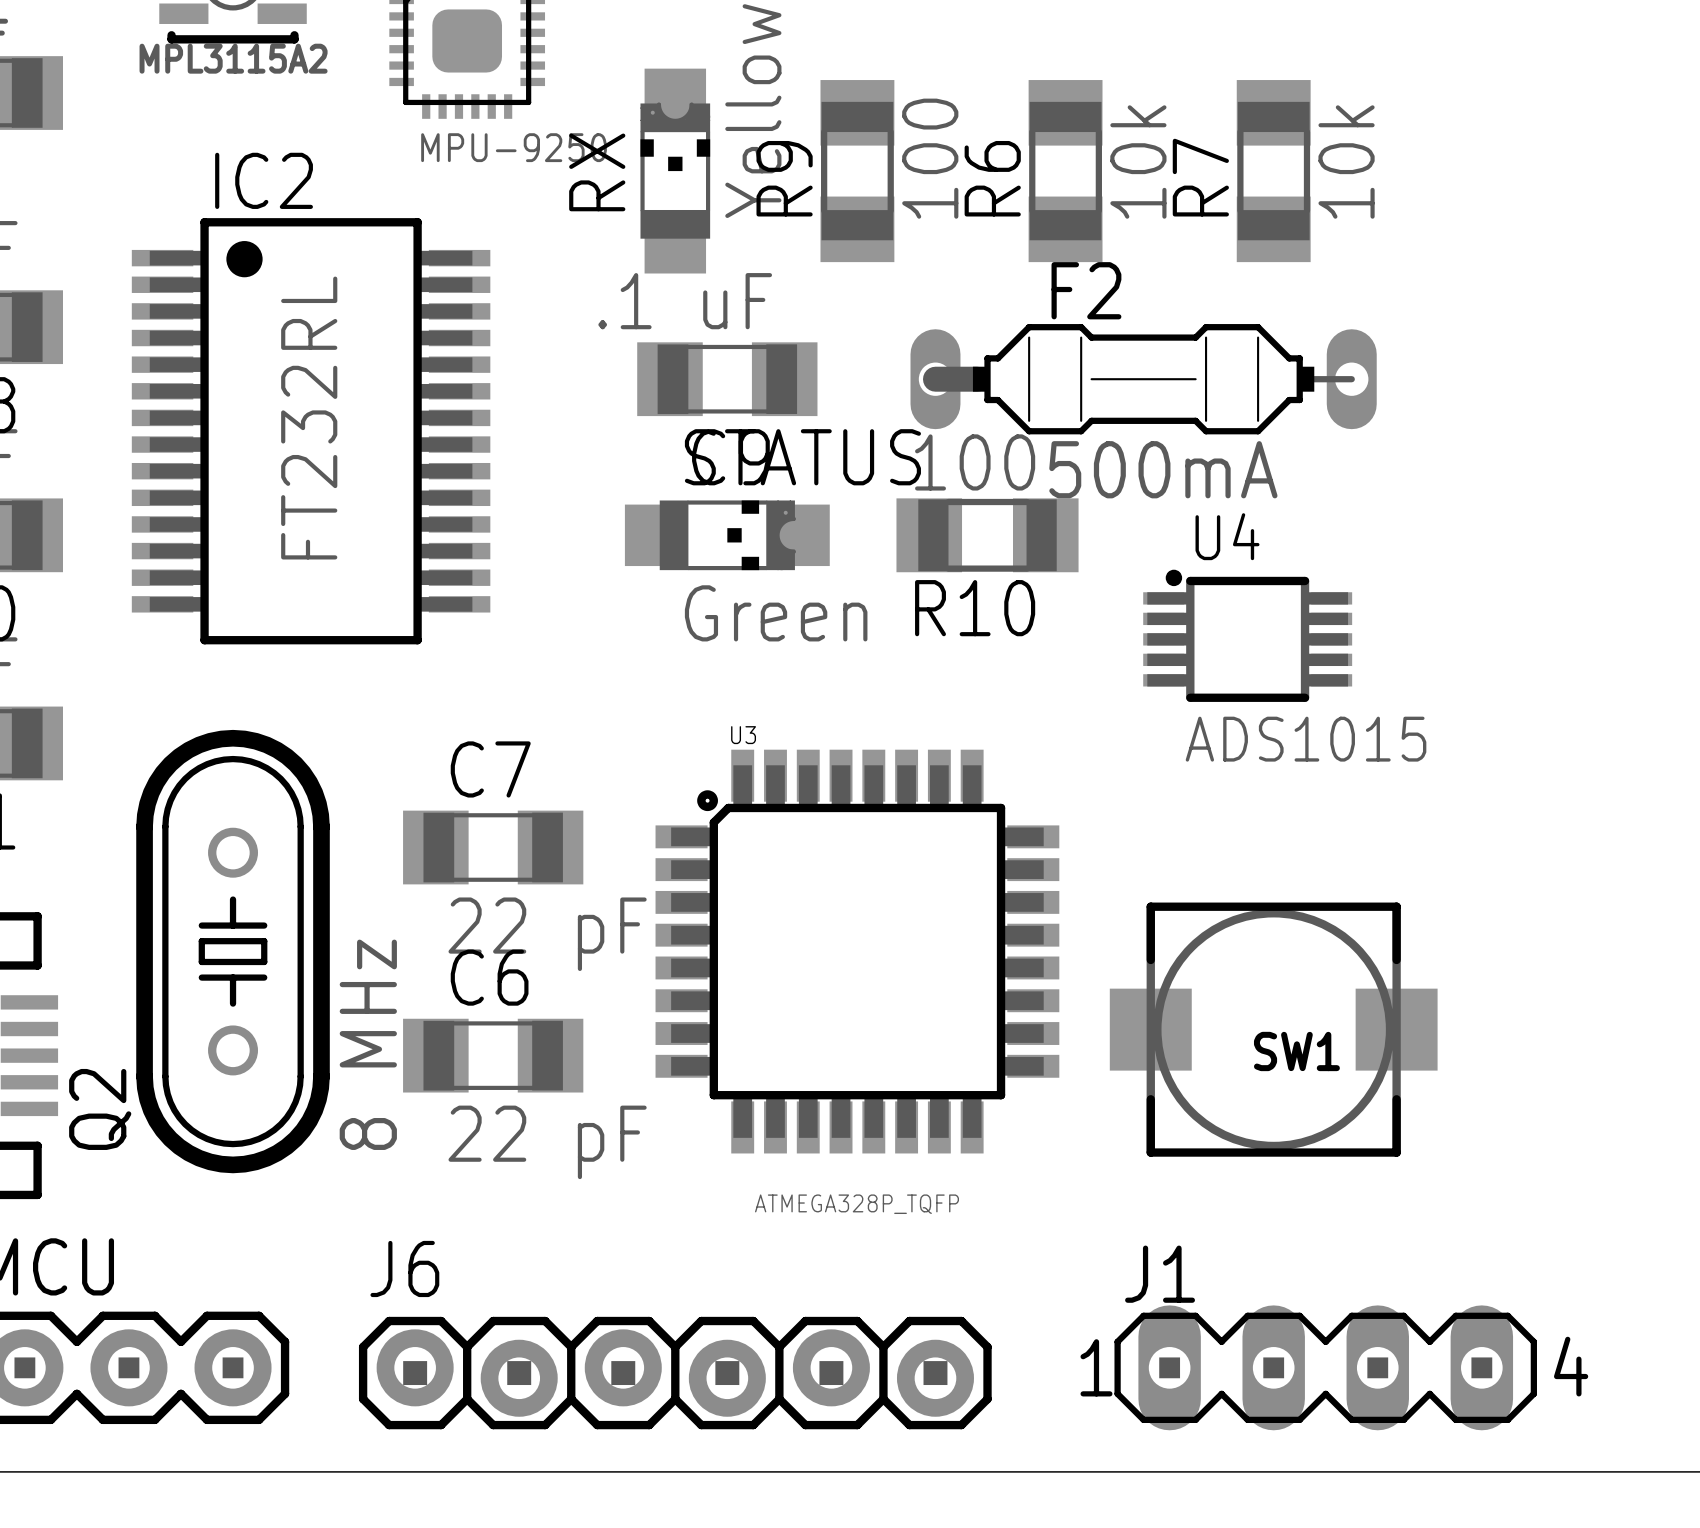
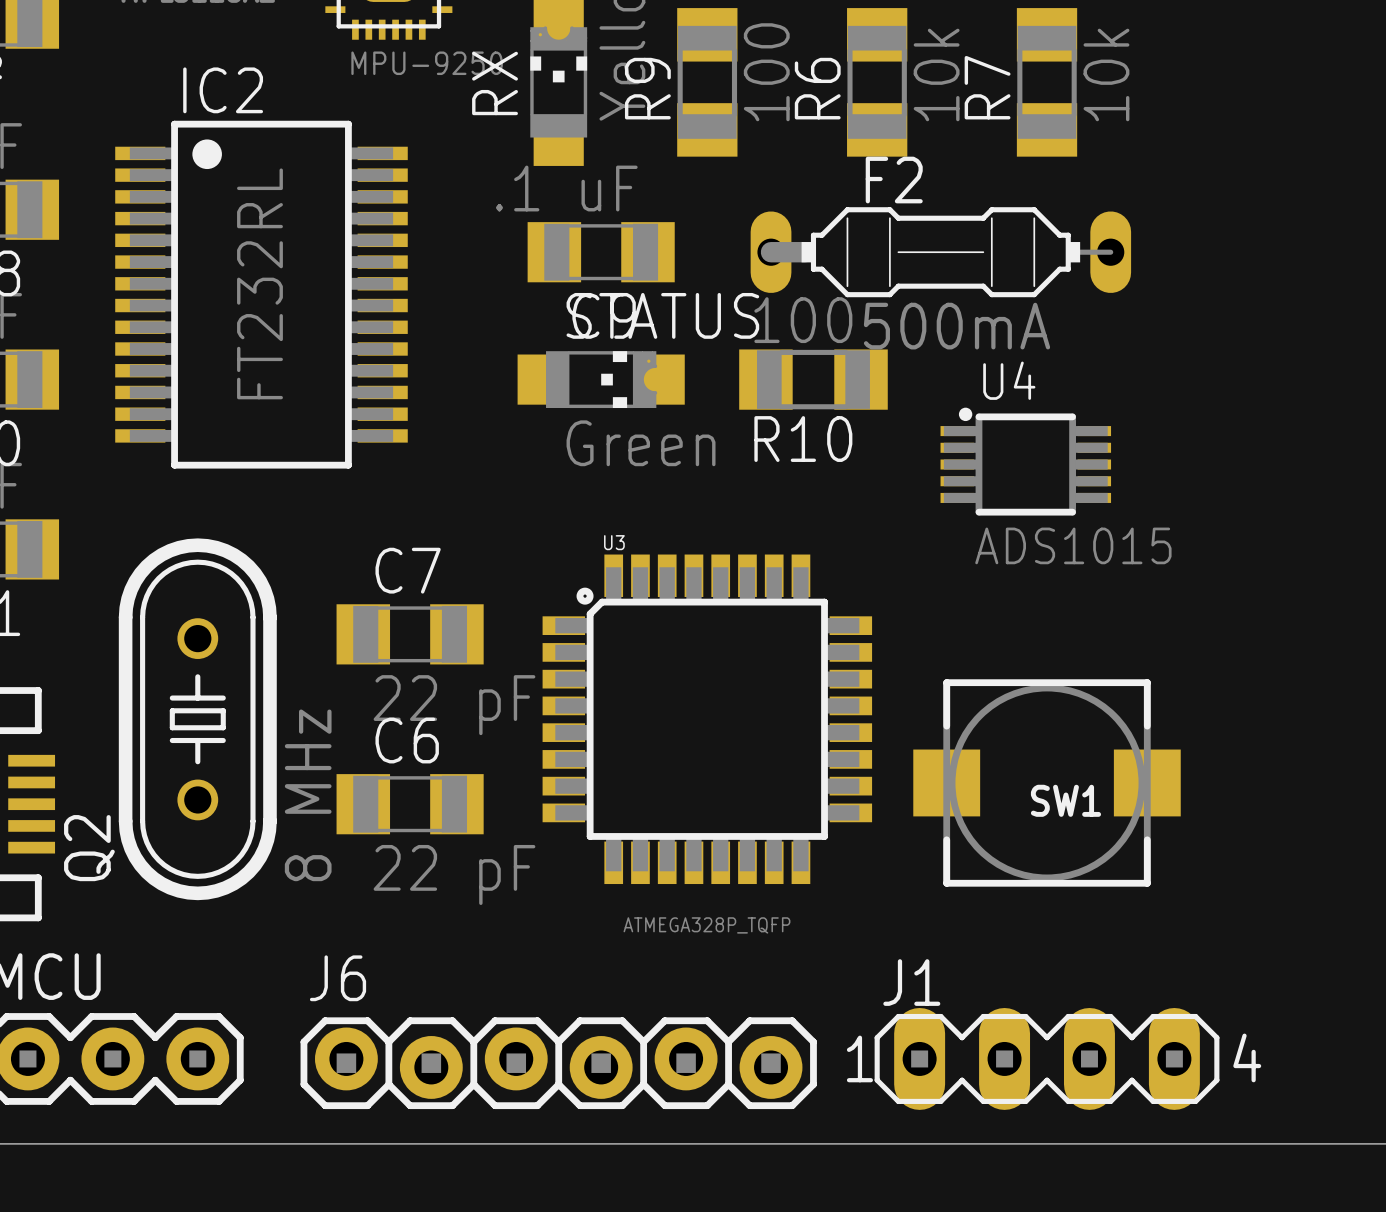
J1 position: (1325, 1367) -> (1047, 1058)

